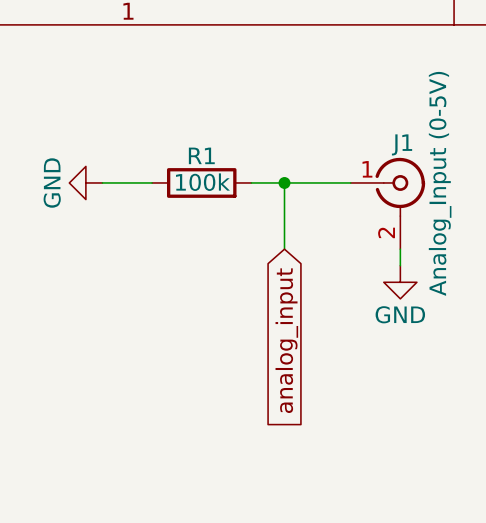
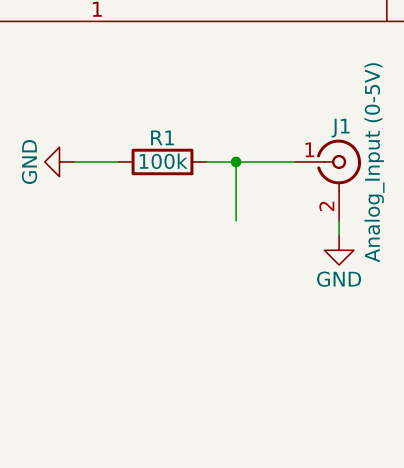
global label: analog_input (286, 340) -> none

